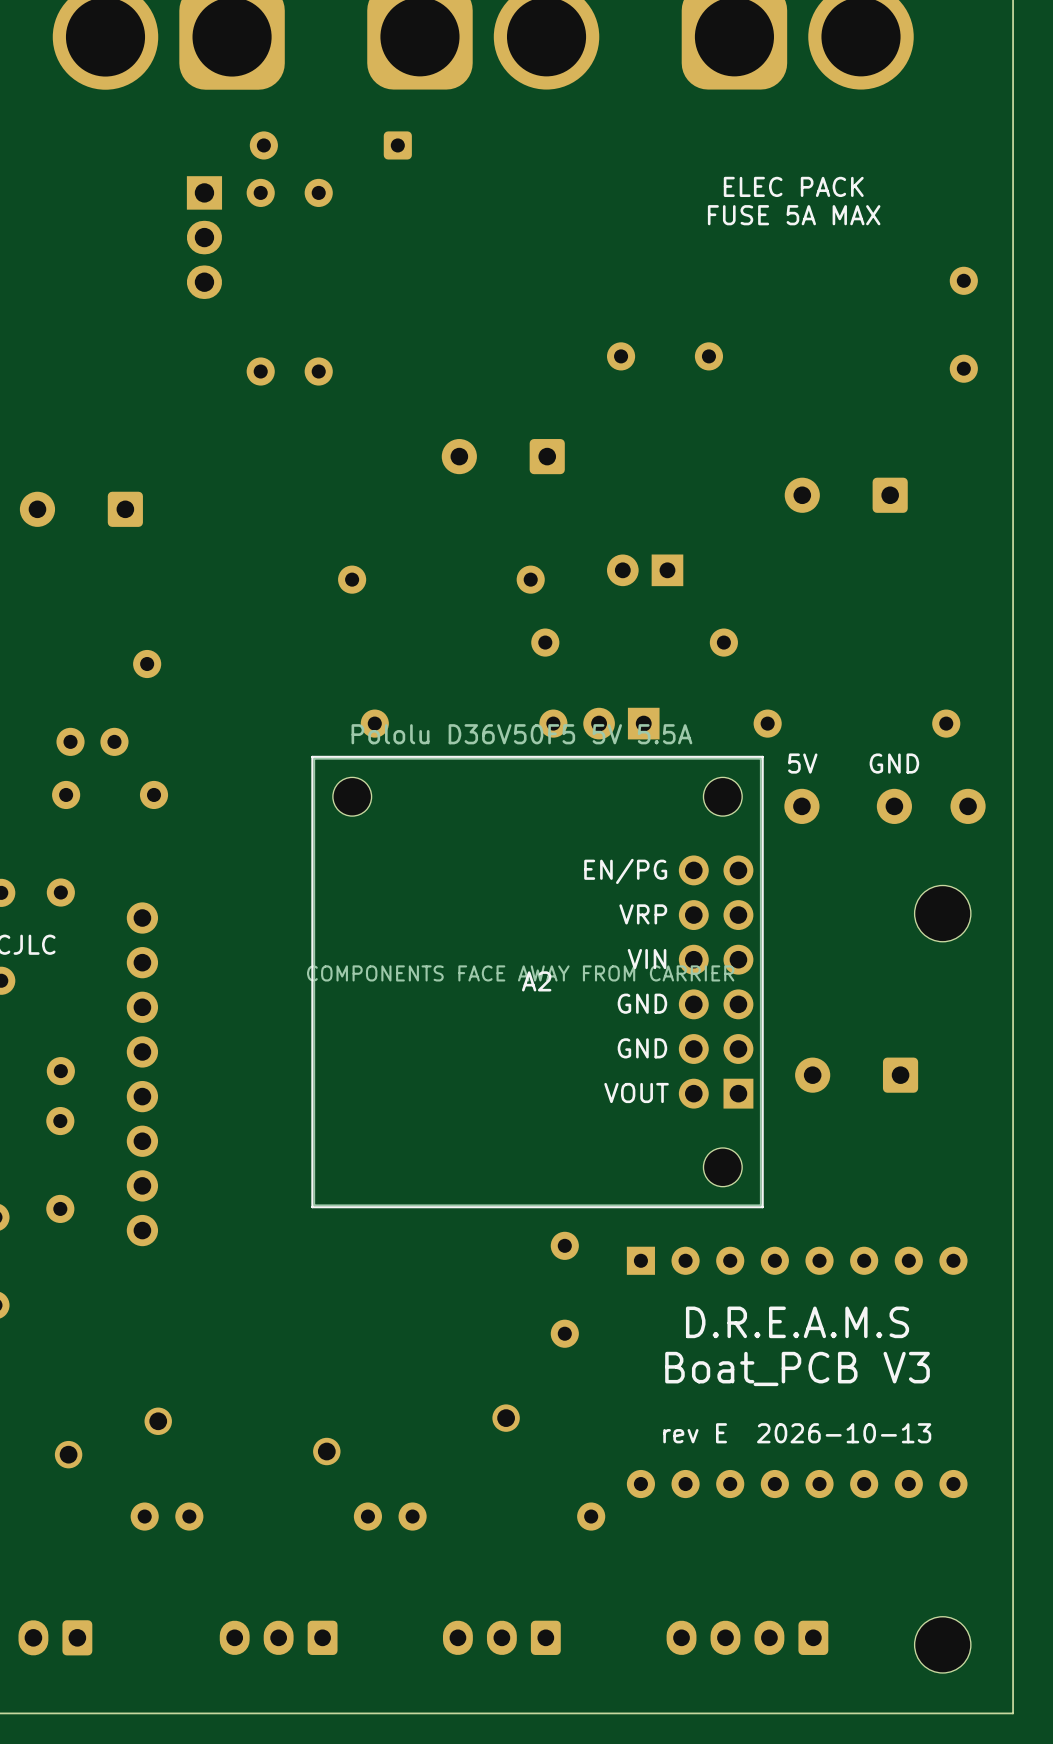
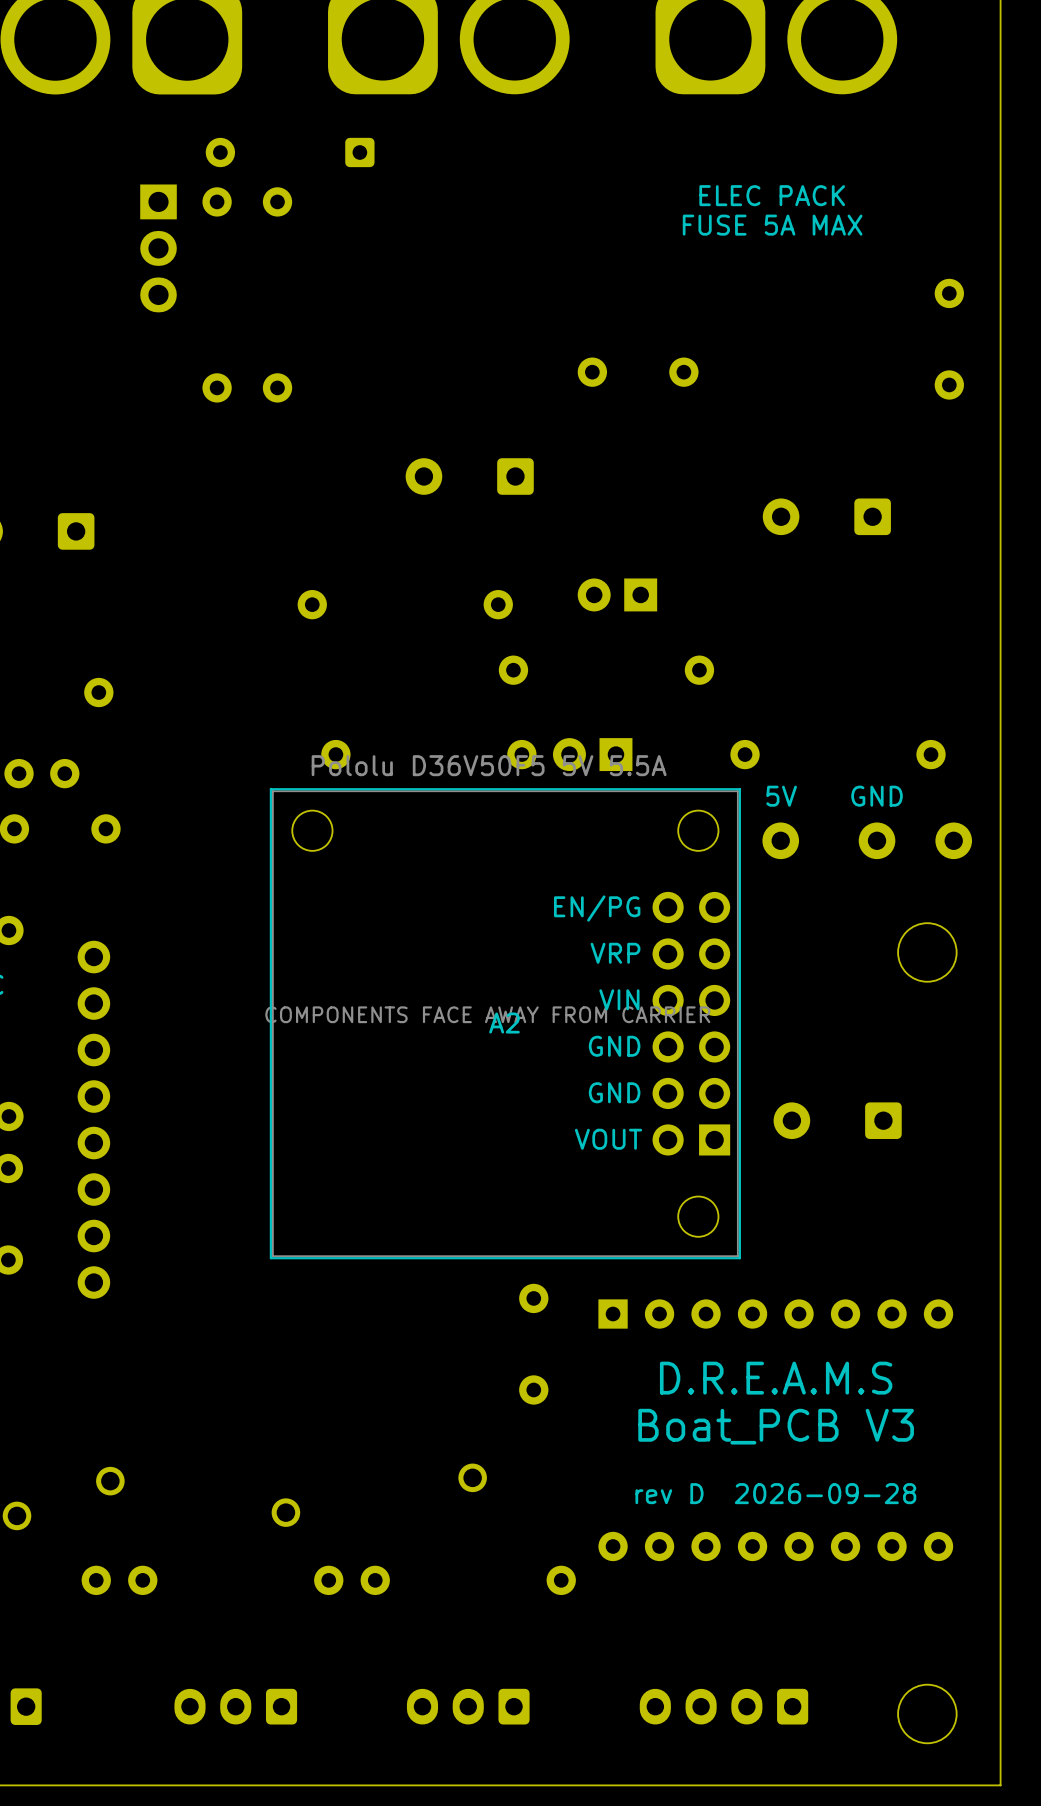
text: rev E 2026-10-13 (797, 1433) -> rev D 2026-09-28 (775, 1493)

